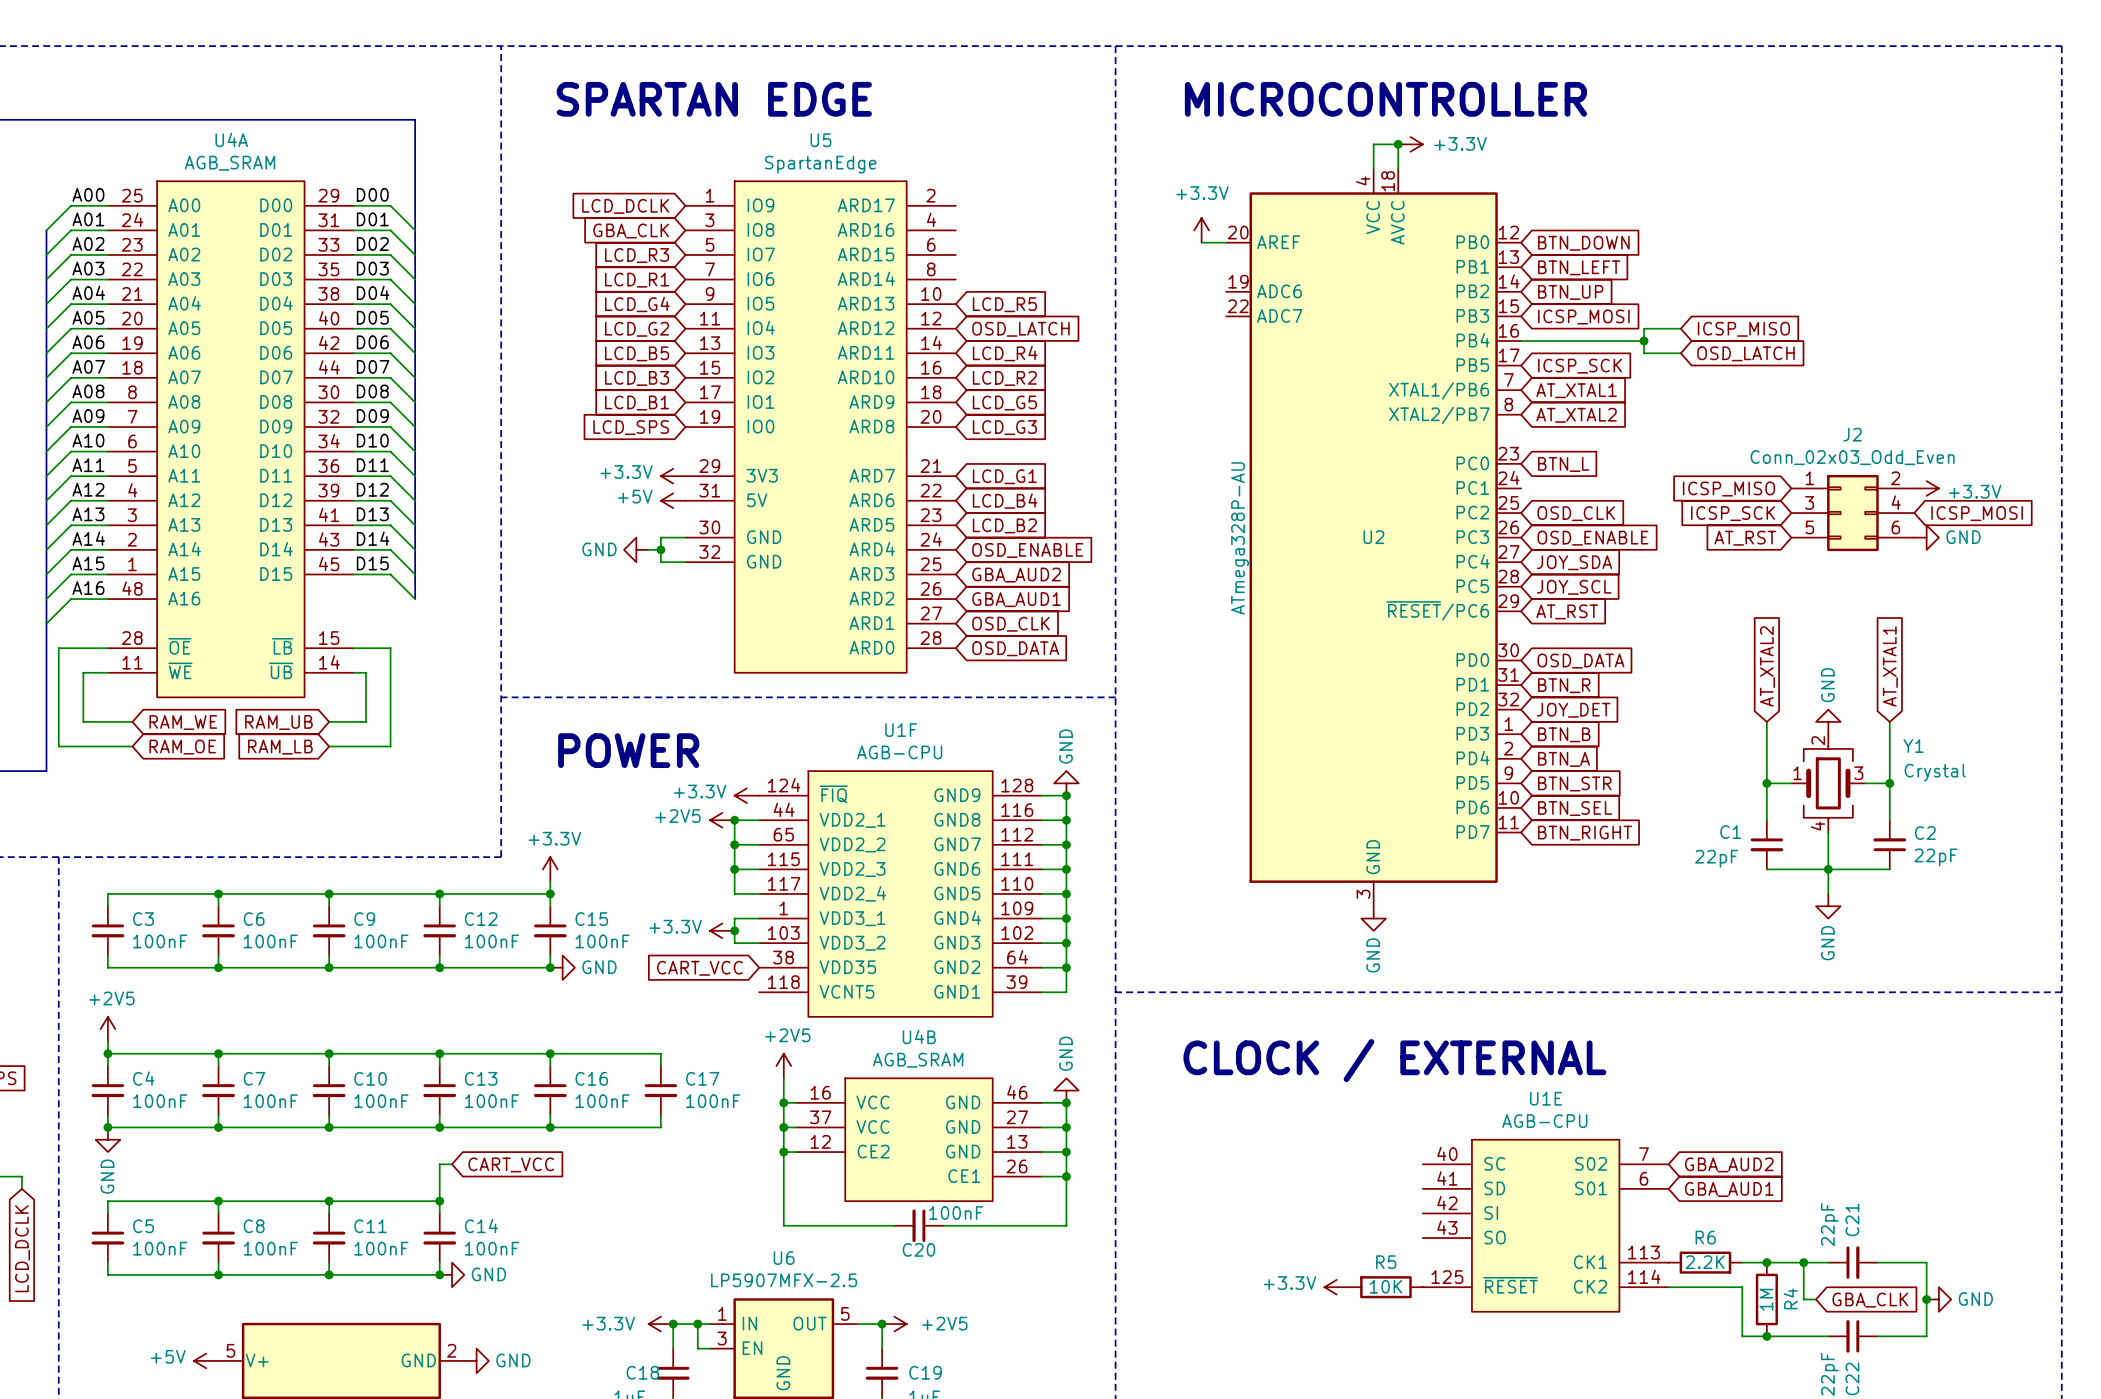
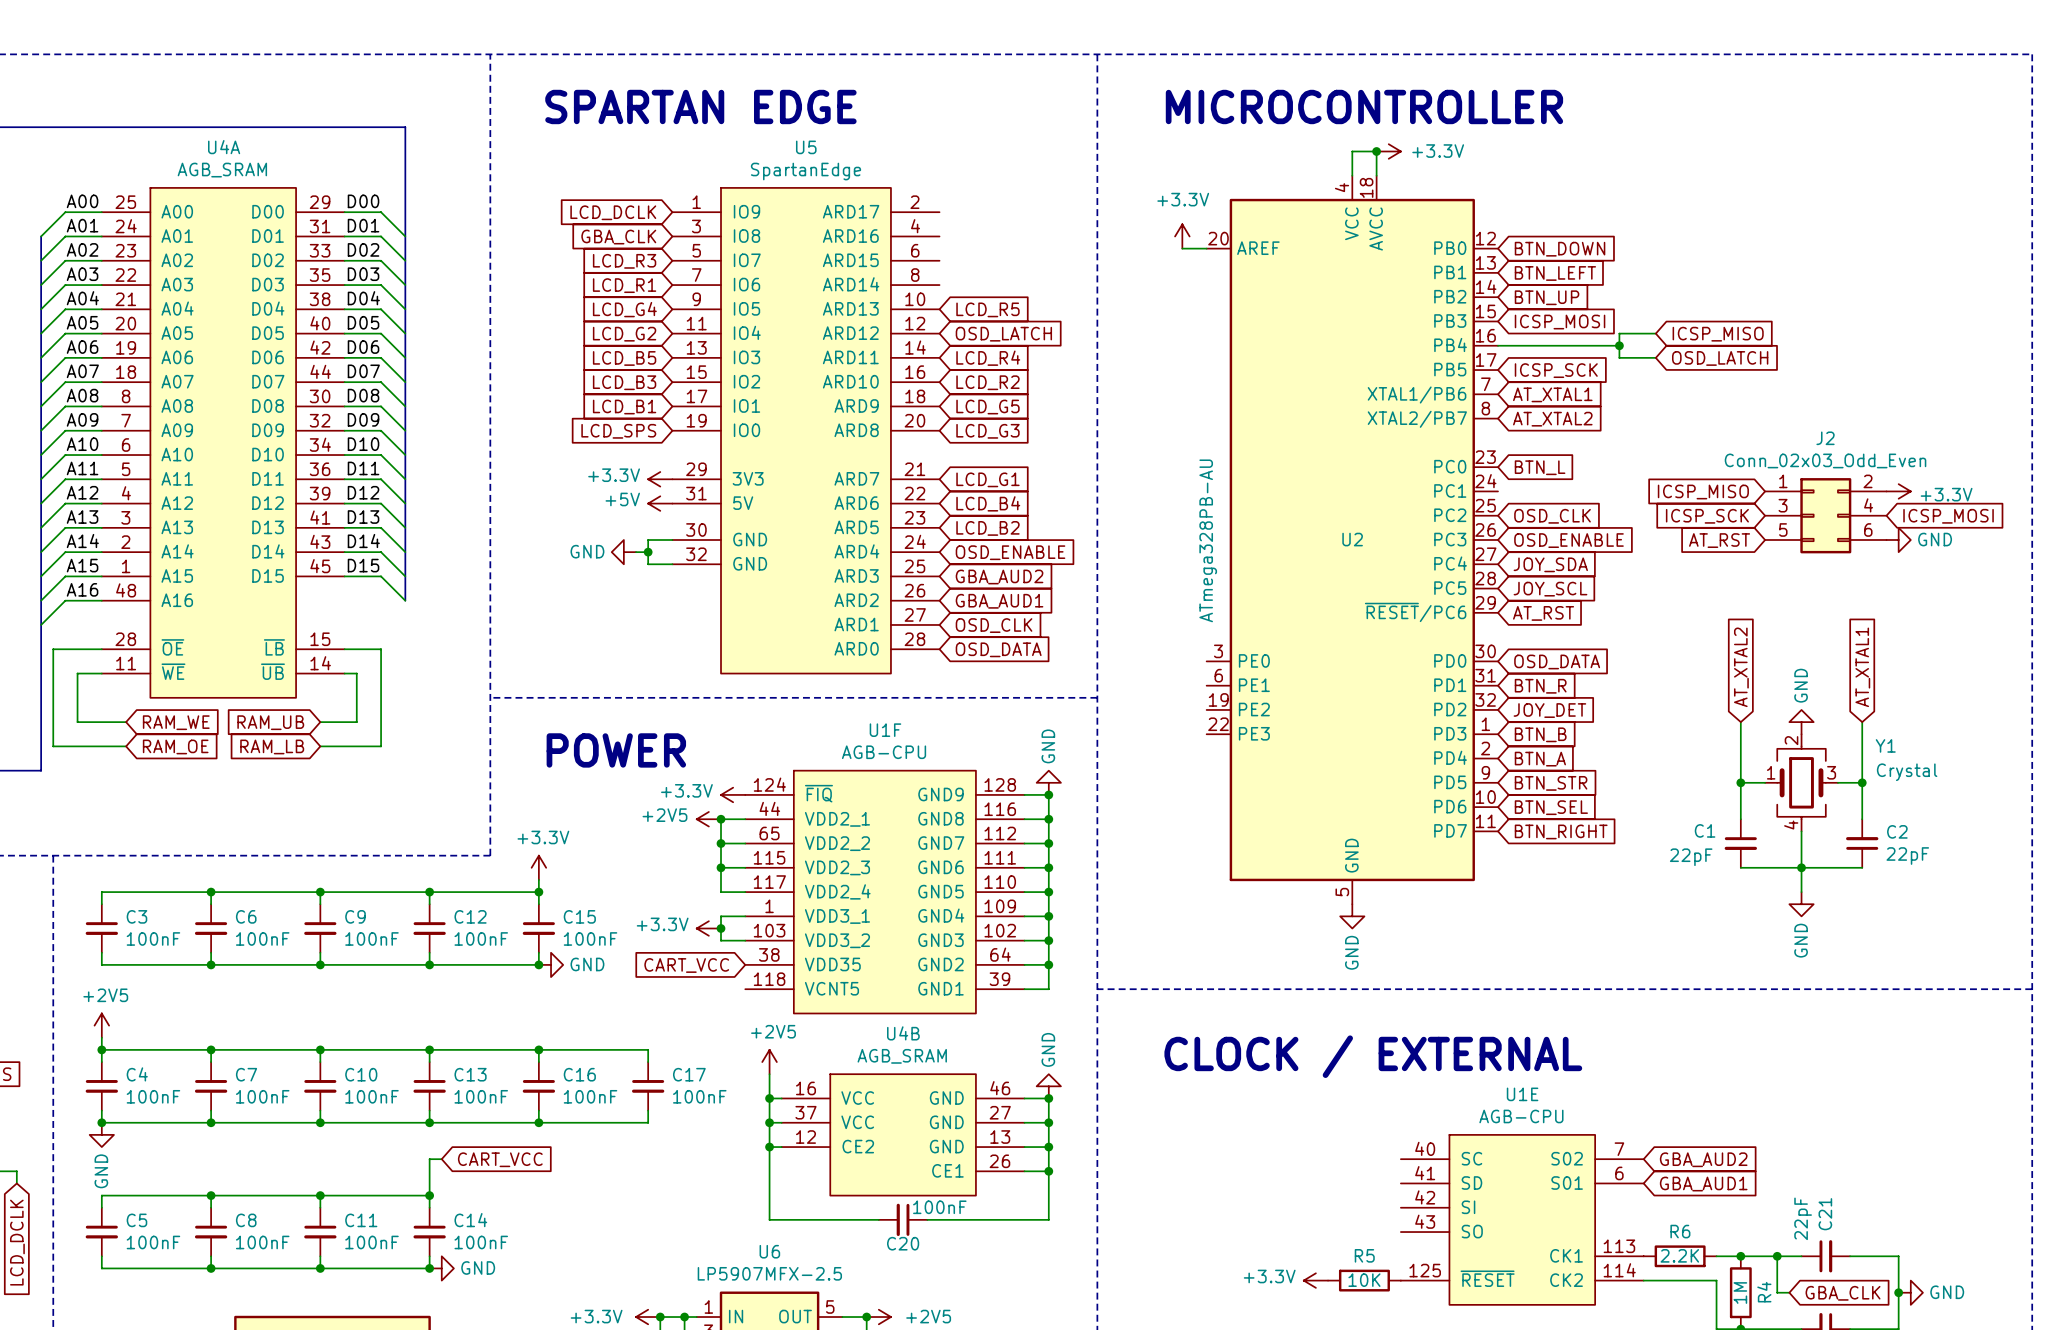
U2 symbol: [1226, 168, 1522, 907] -> [1206, 175, 1499, 905]
U2 value: ATmega328P-AU (1240, 538) -> ATmega328PB-AU (1208, 540)

